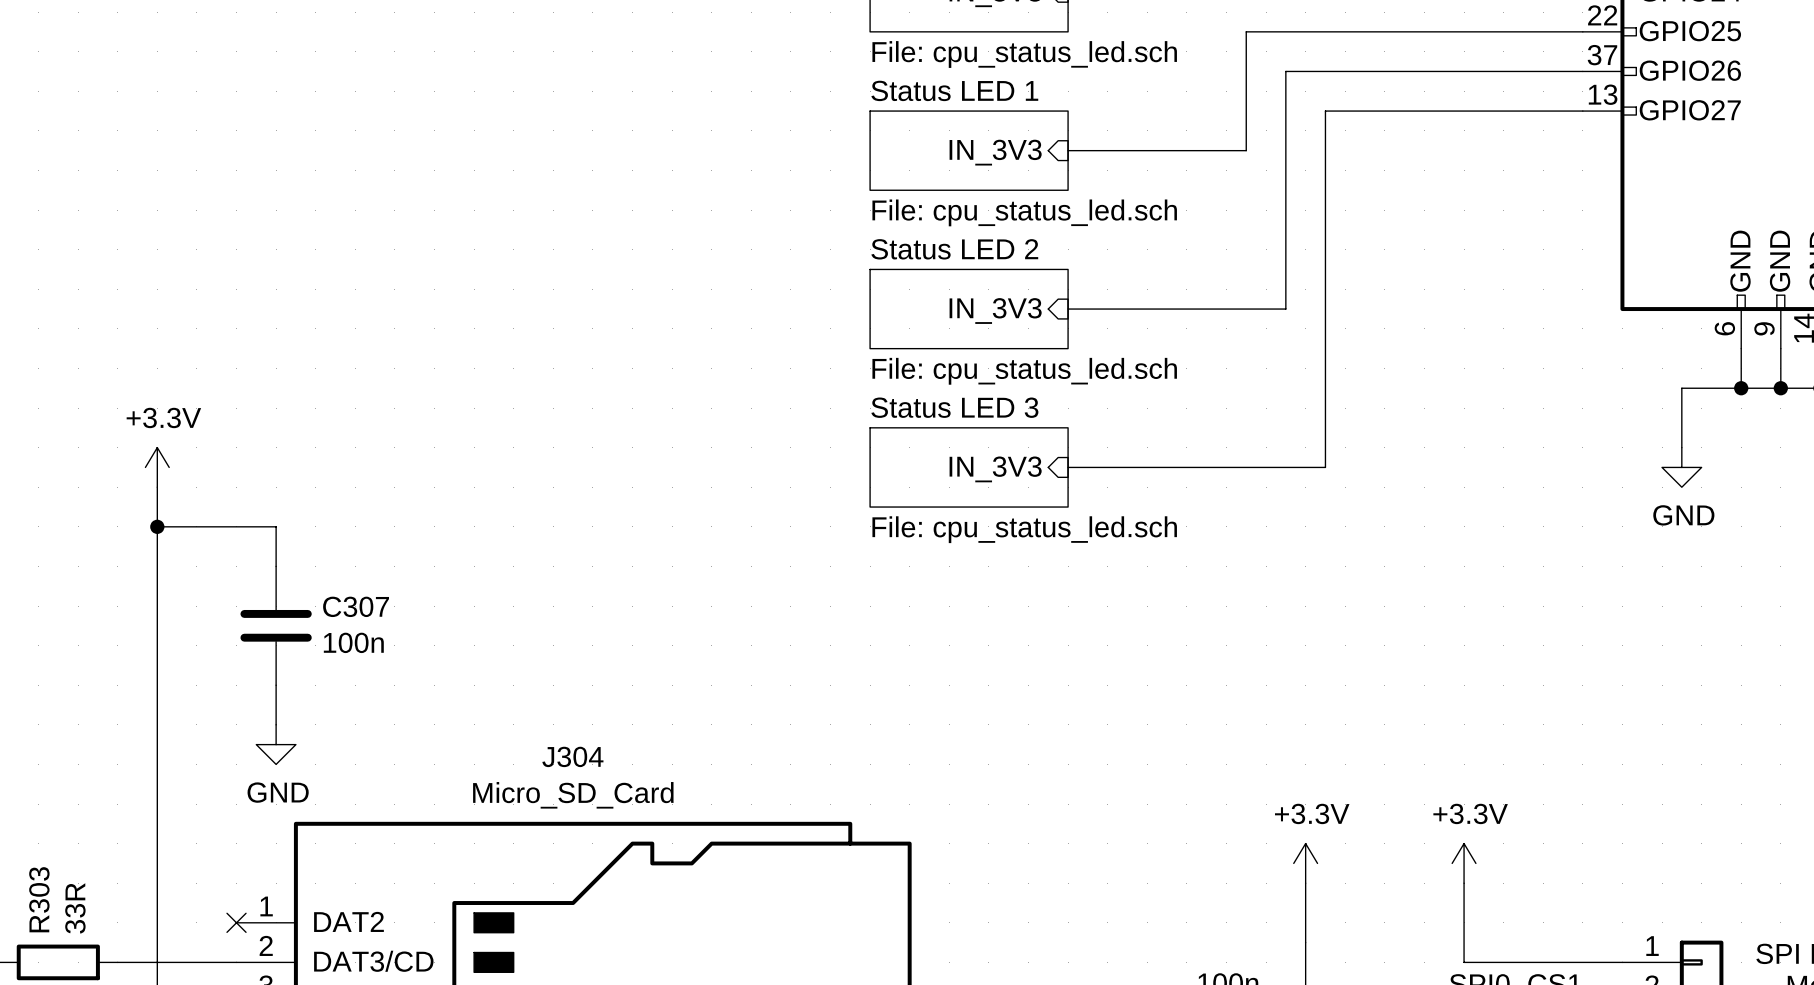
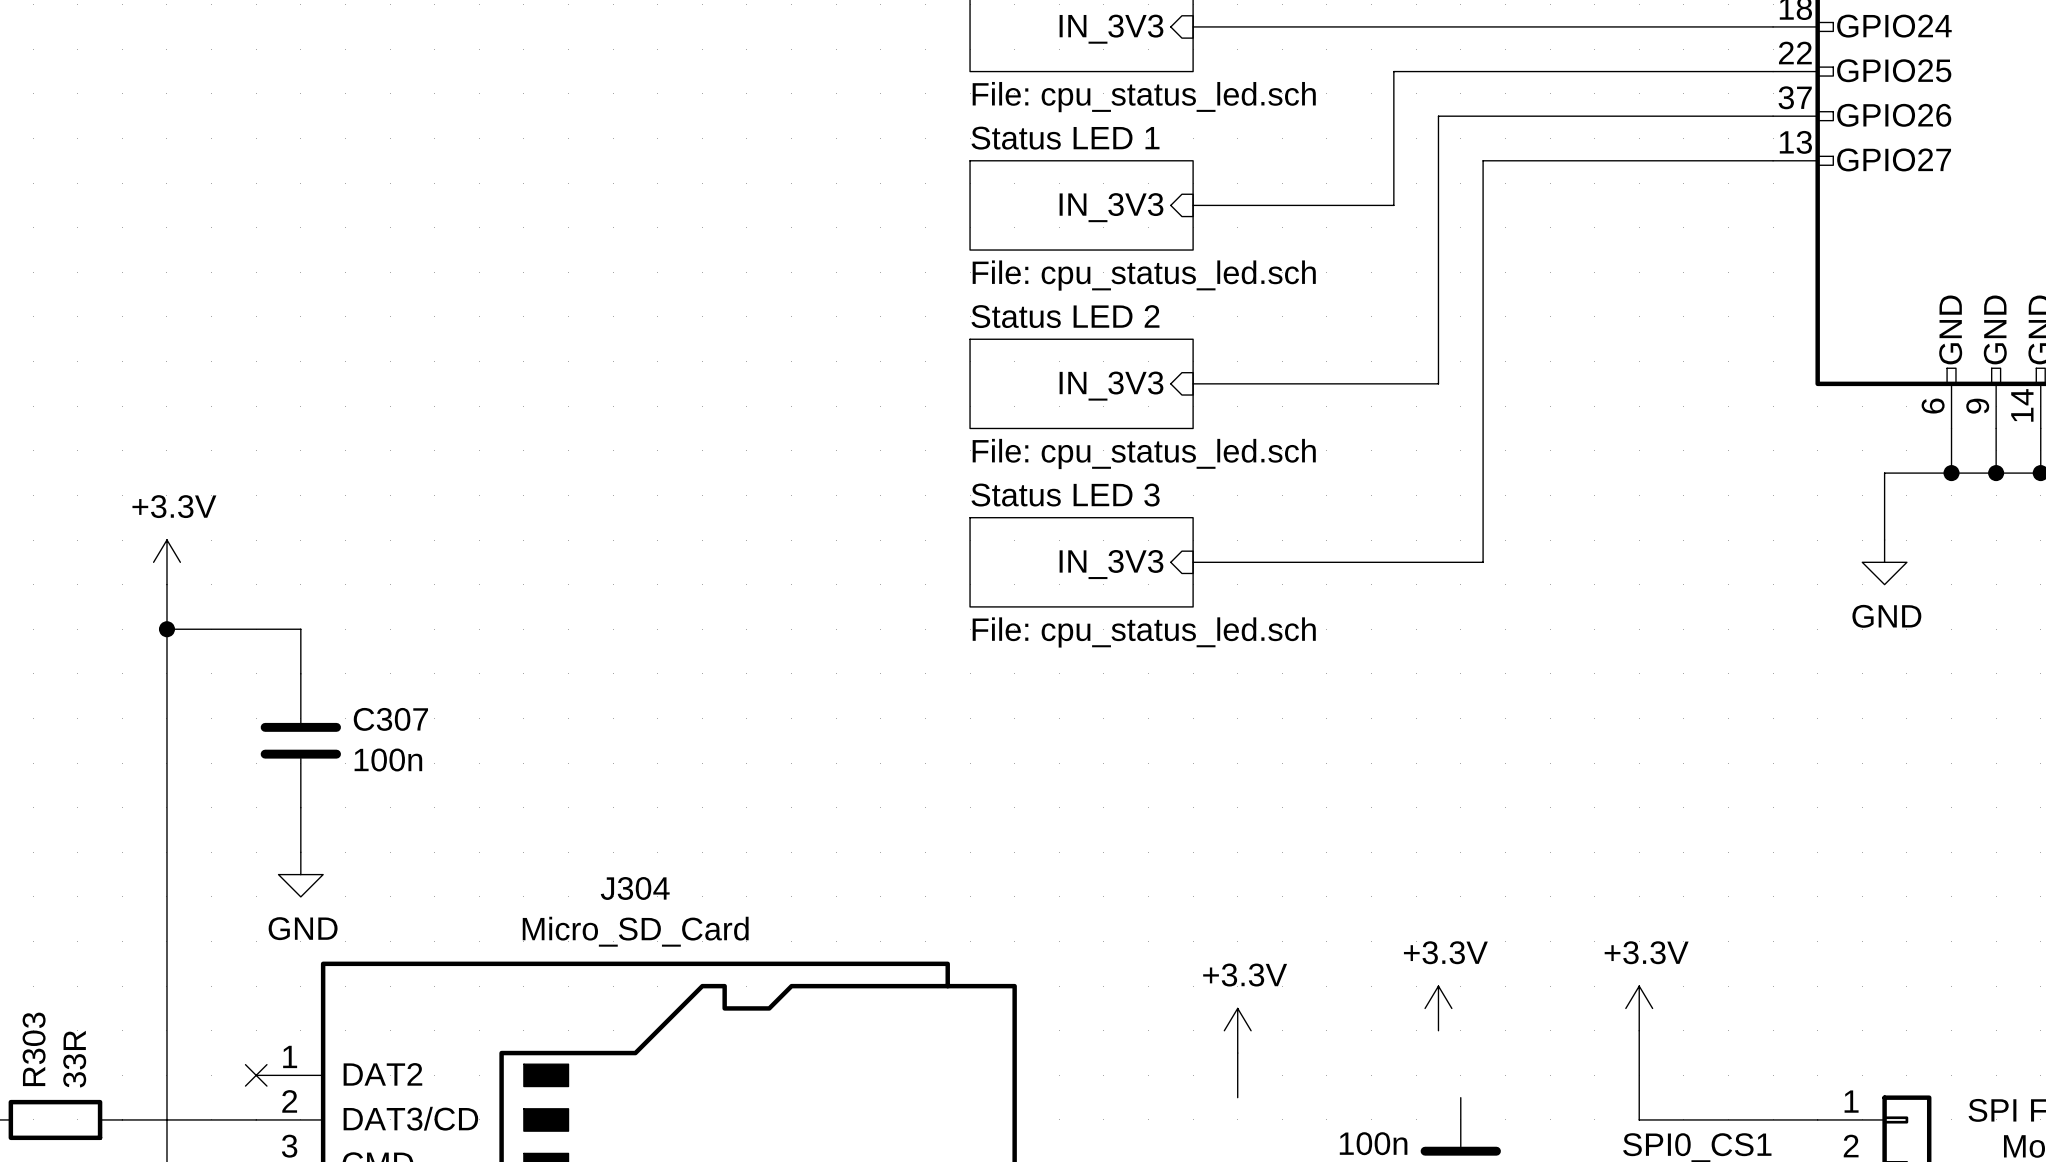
power symbol position: +3.3V (1305, 863) -> +3.3V (1438, 1008)
power symbol: none -> +3.3V (1237, 1030)
wire: (1305, 883) (1305, 942) -> none
wire: none -> (1237, 1053) (1237, 1097)

